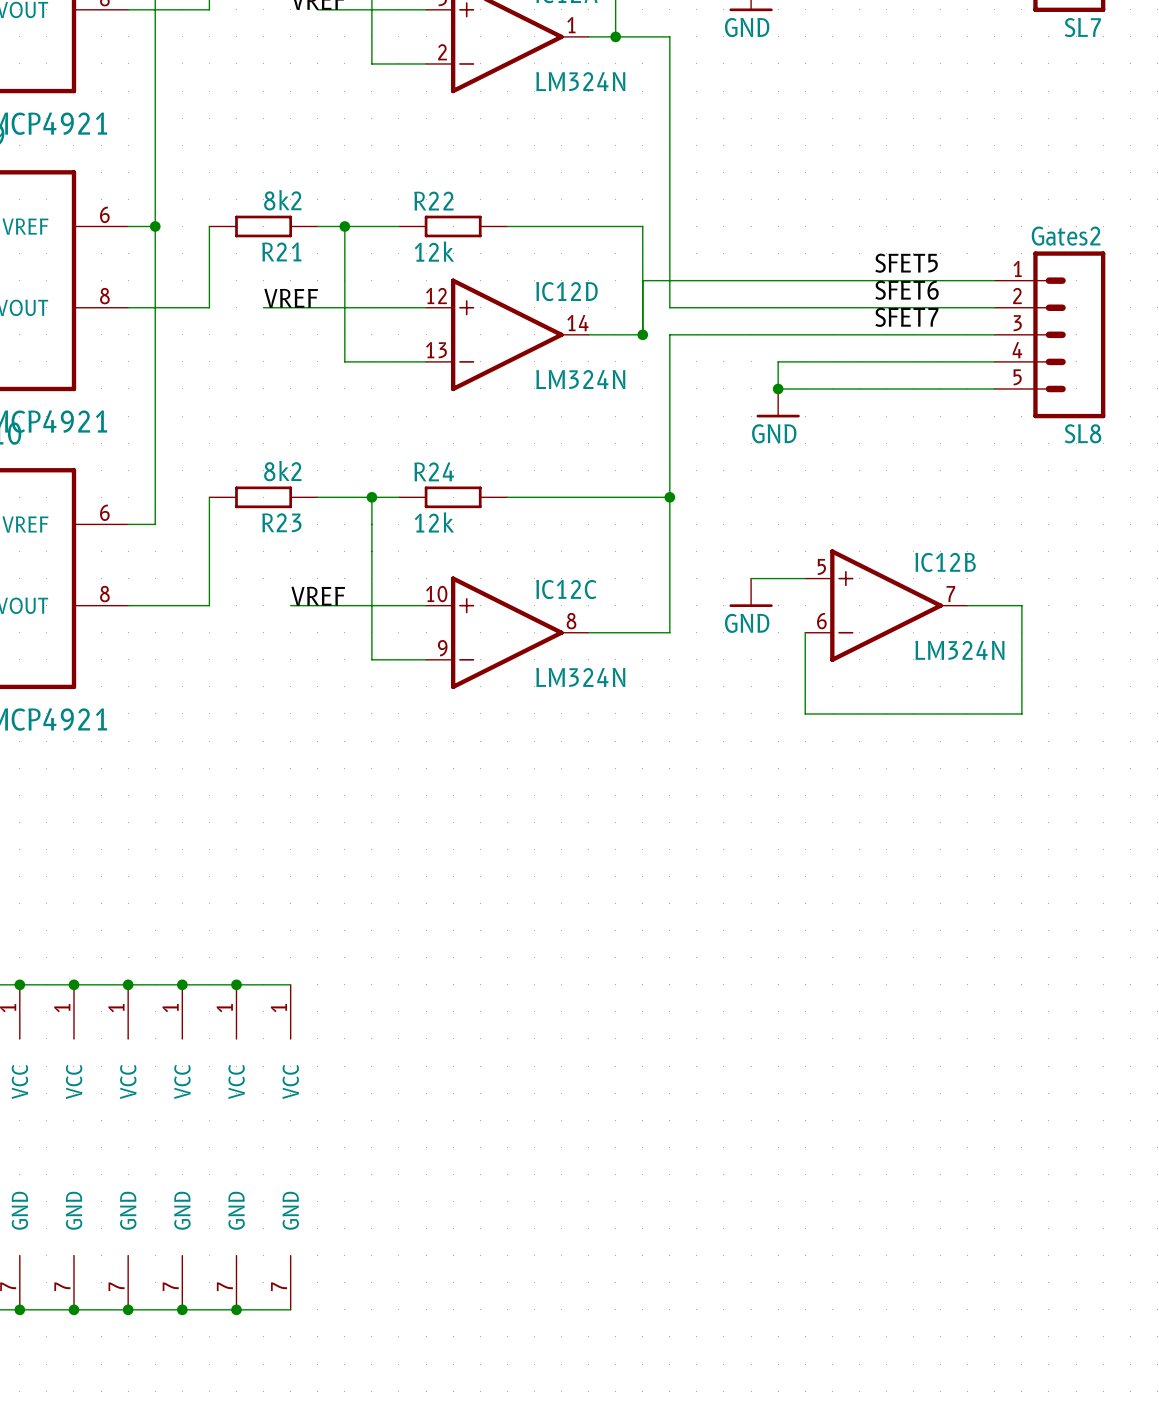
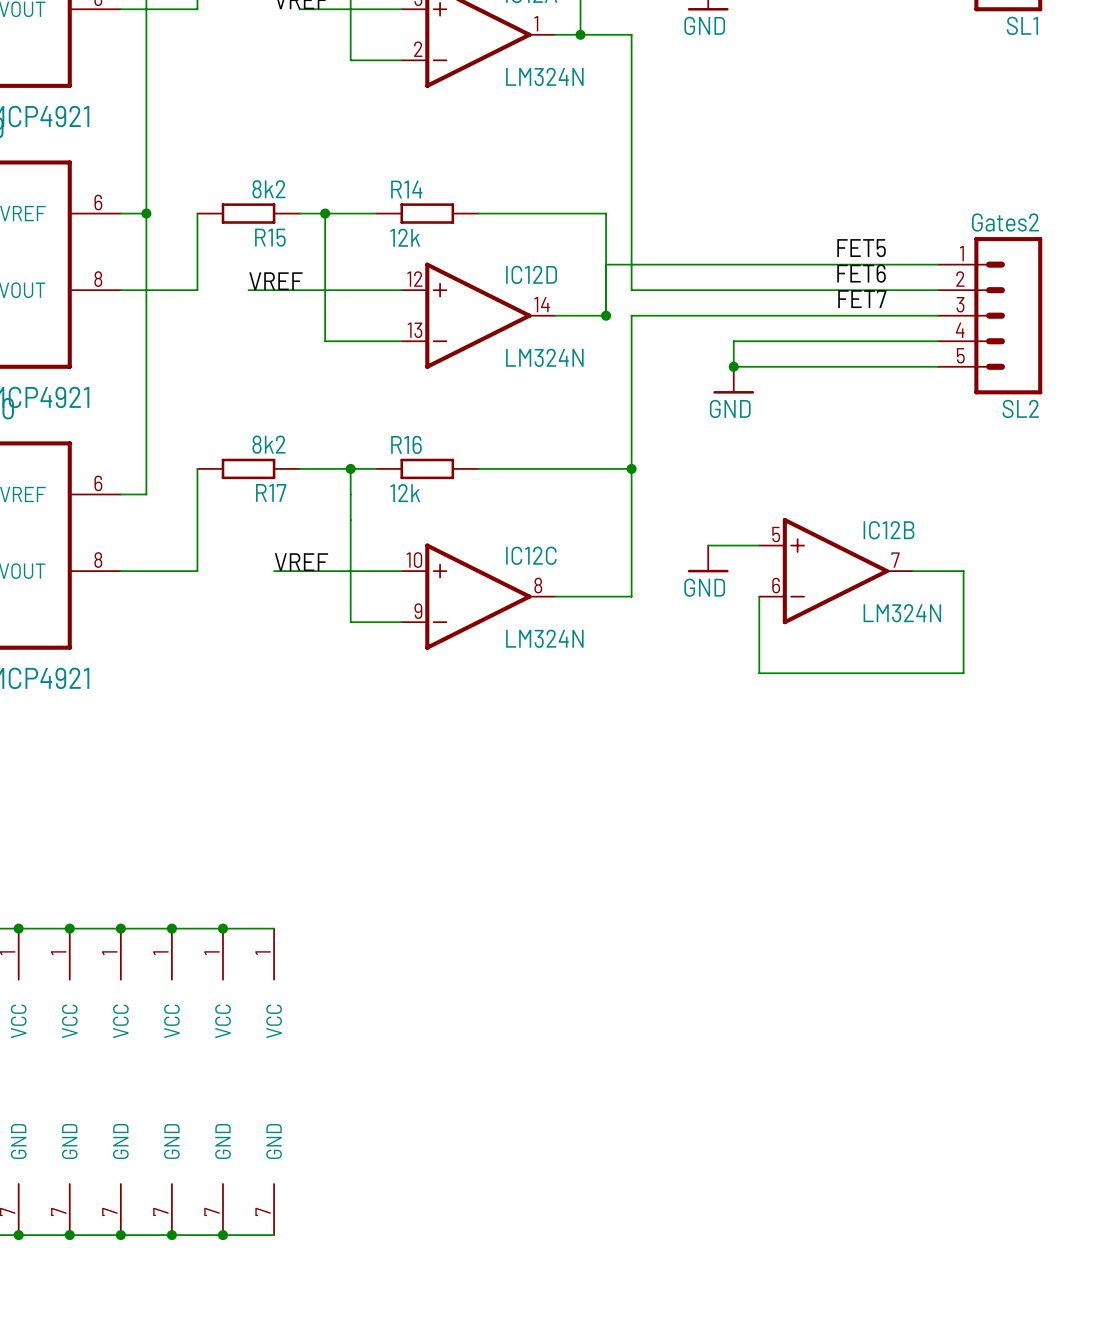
SL7 name: SL7 (1082, 27) -> SL1 (1022, 25)
R22 name: R22 (433, 201) -> R14 (406, 189)
R21 name: R21 (281, 251) -> R15 (270, 237)
label: SFET5 (906, 263) -> FET5 (861, 248)
label: SFET6 (907, 290) -> FET6 (861, 273)
label: SFET7 (906, 317) -> FET7 (862, 299)
SL8 name: SL8 (1083, 433) -> SL2 (1020, 408)
R24 name: R24 (434, 471) -> R16 (406, 444)
R23 name: R23 (281, 522) -> R17 (271, 492)

